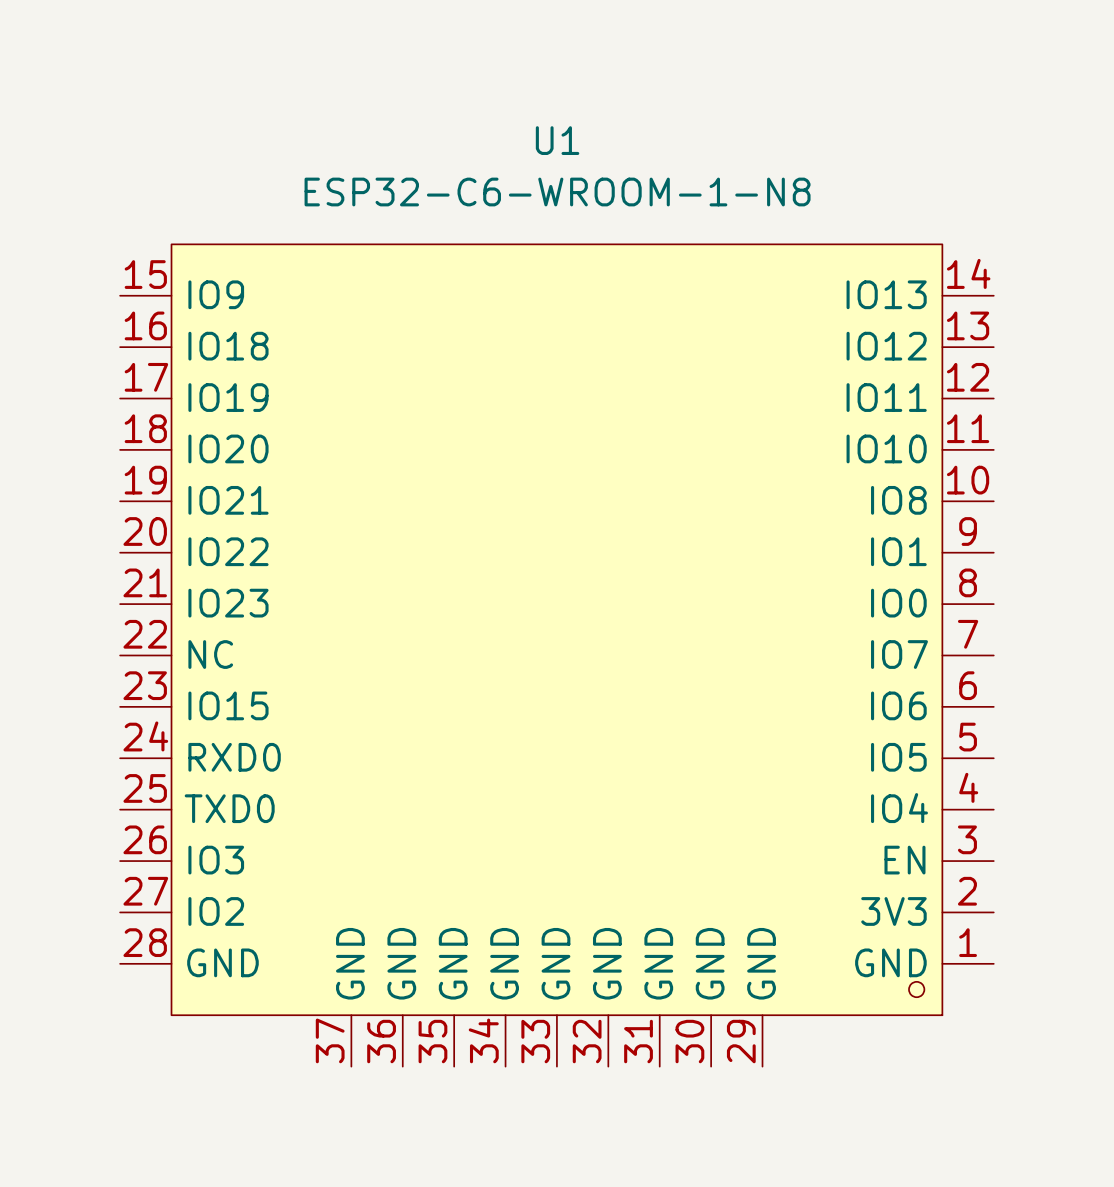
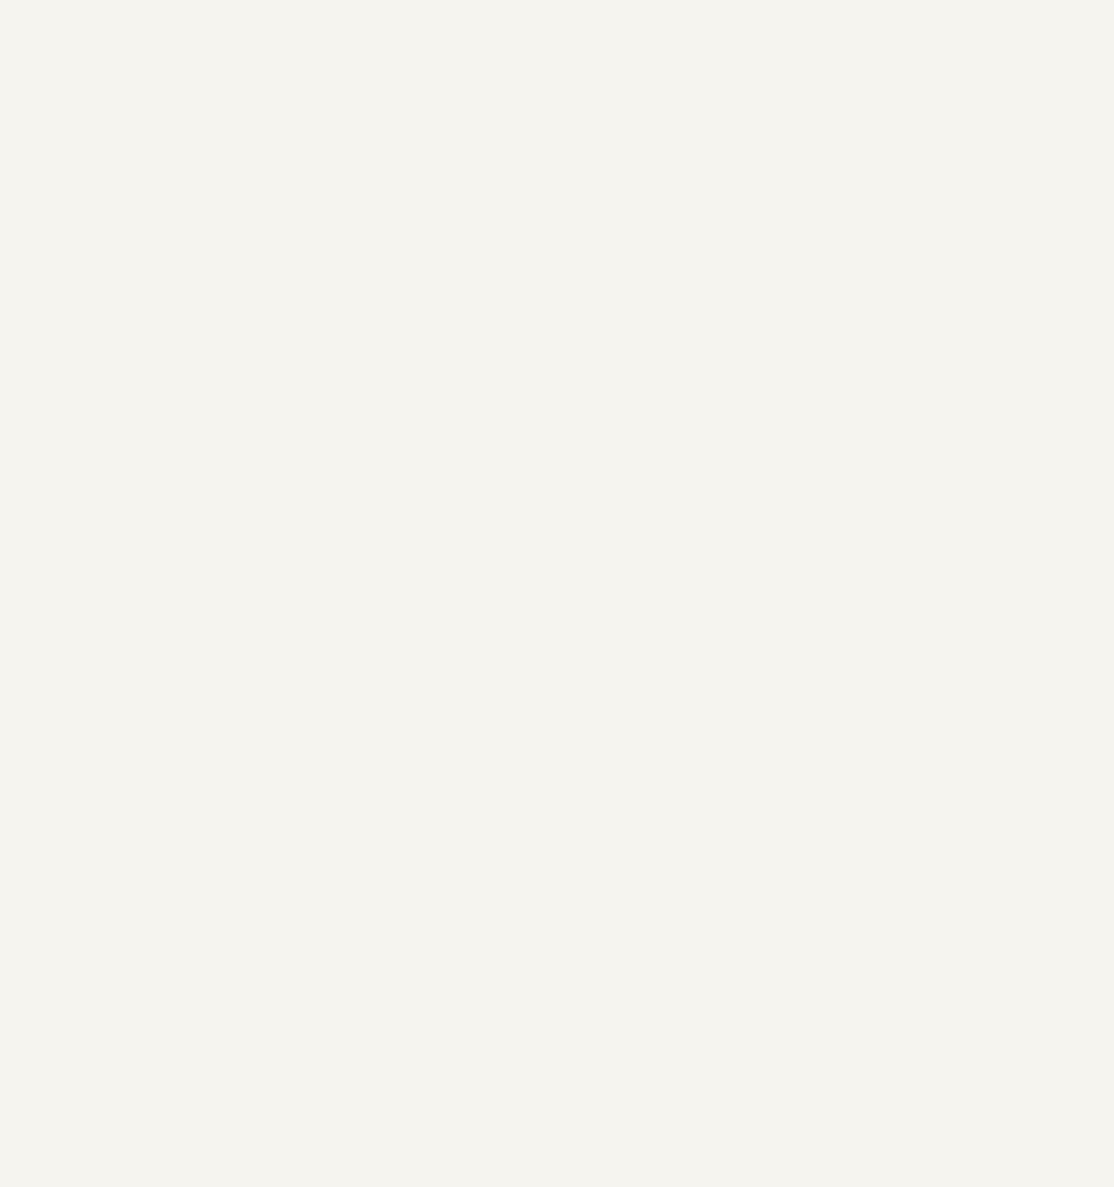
U1: ESP32-C6-WROOM-1-N8 (556, 655) -> none

